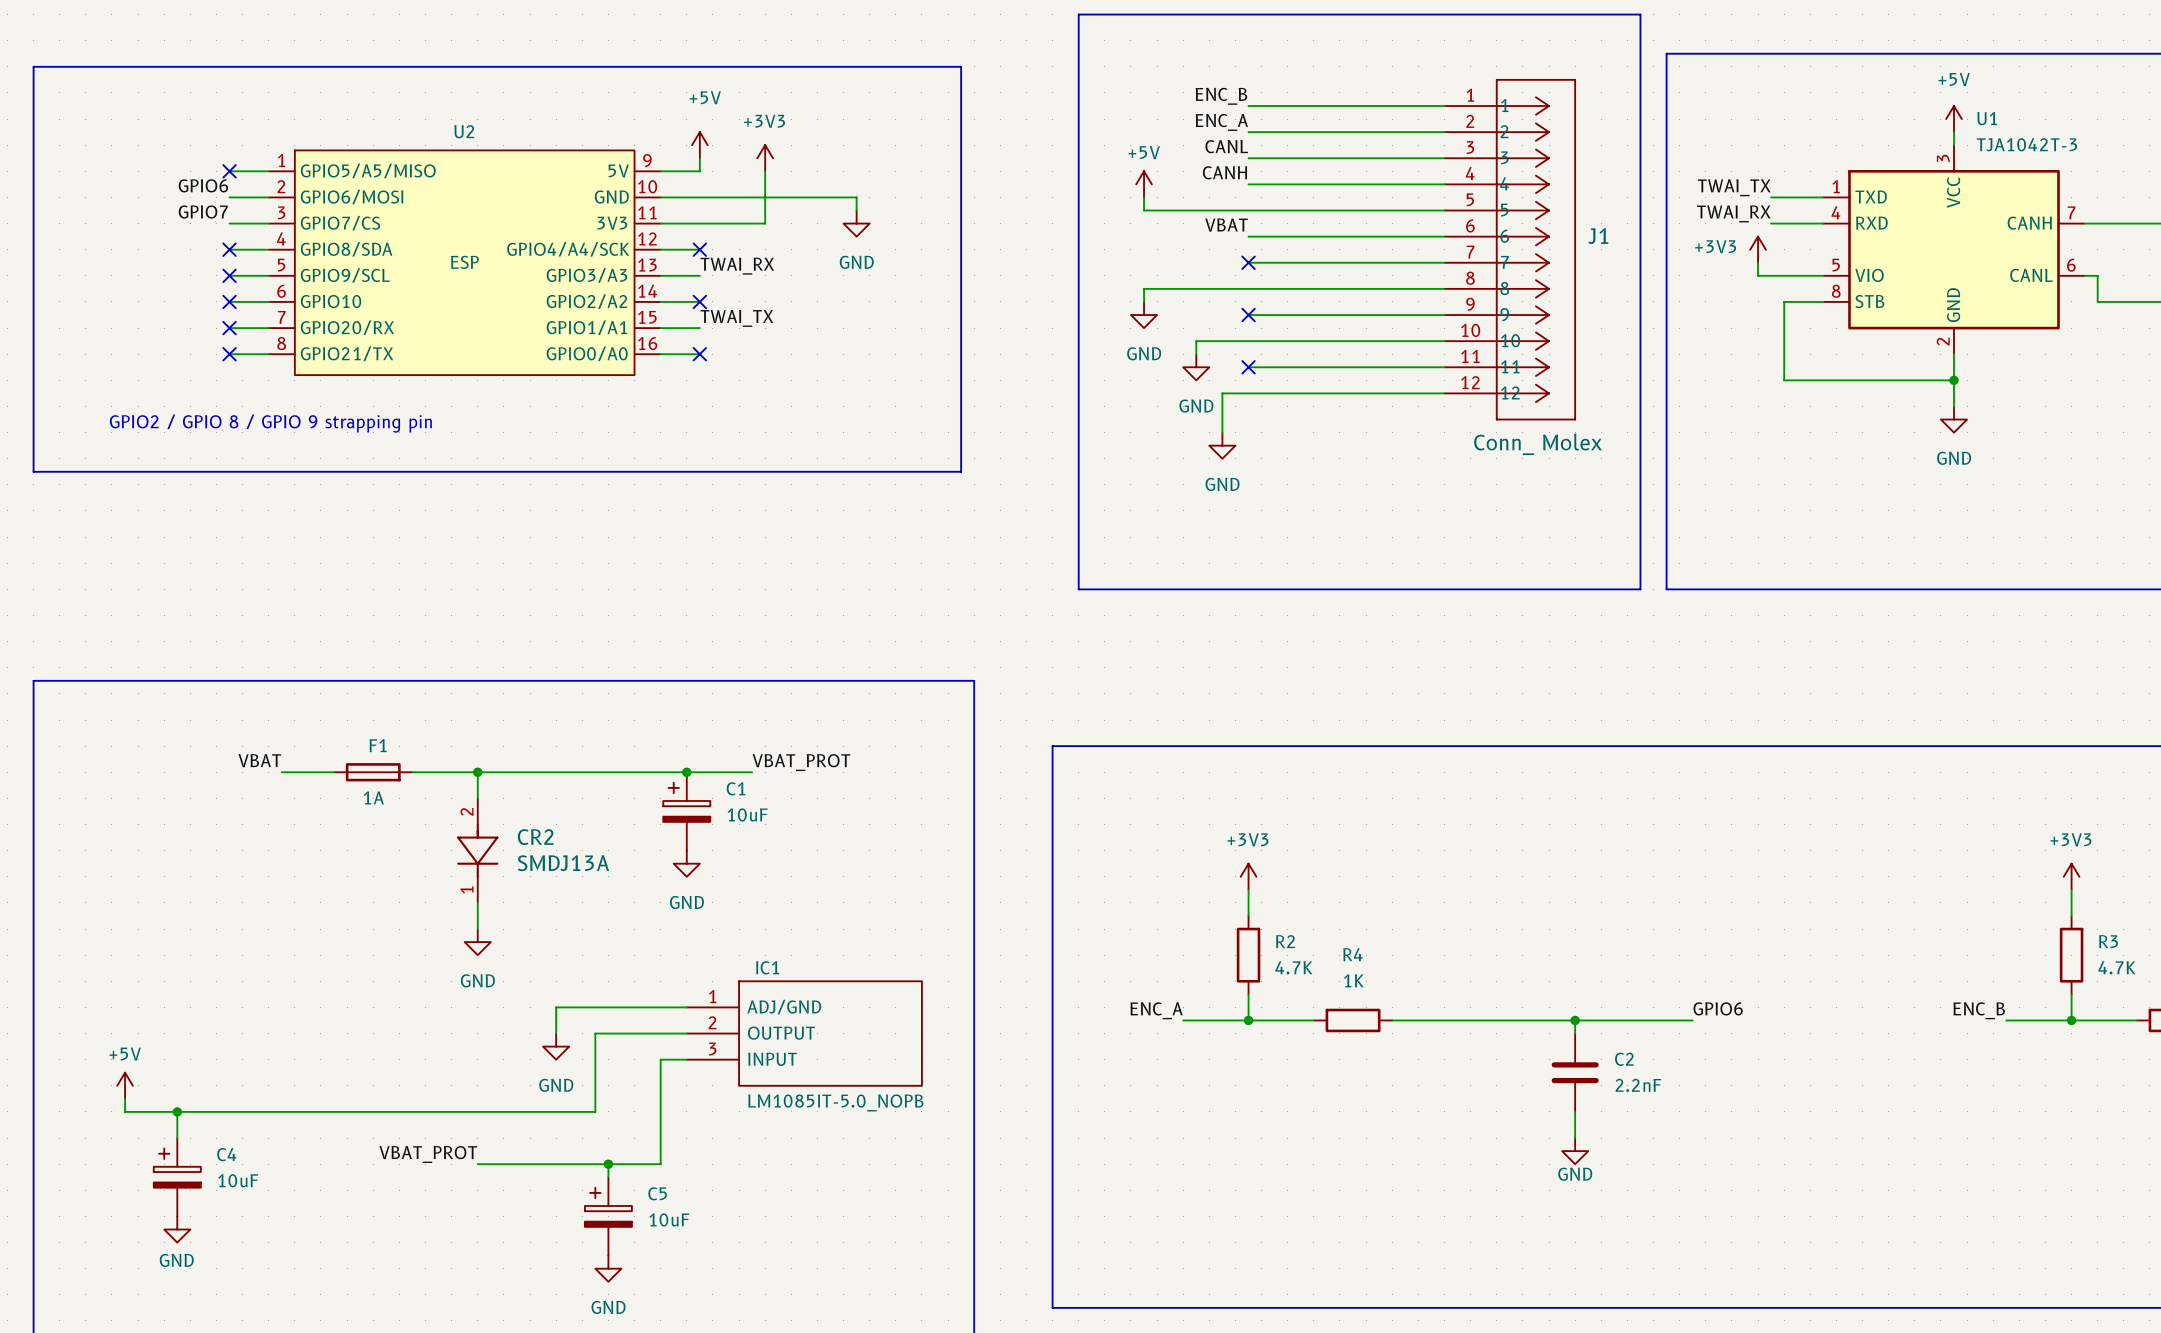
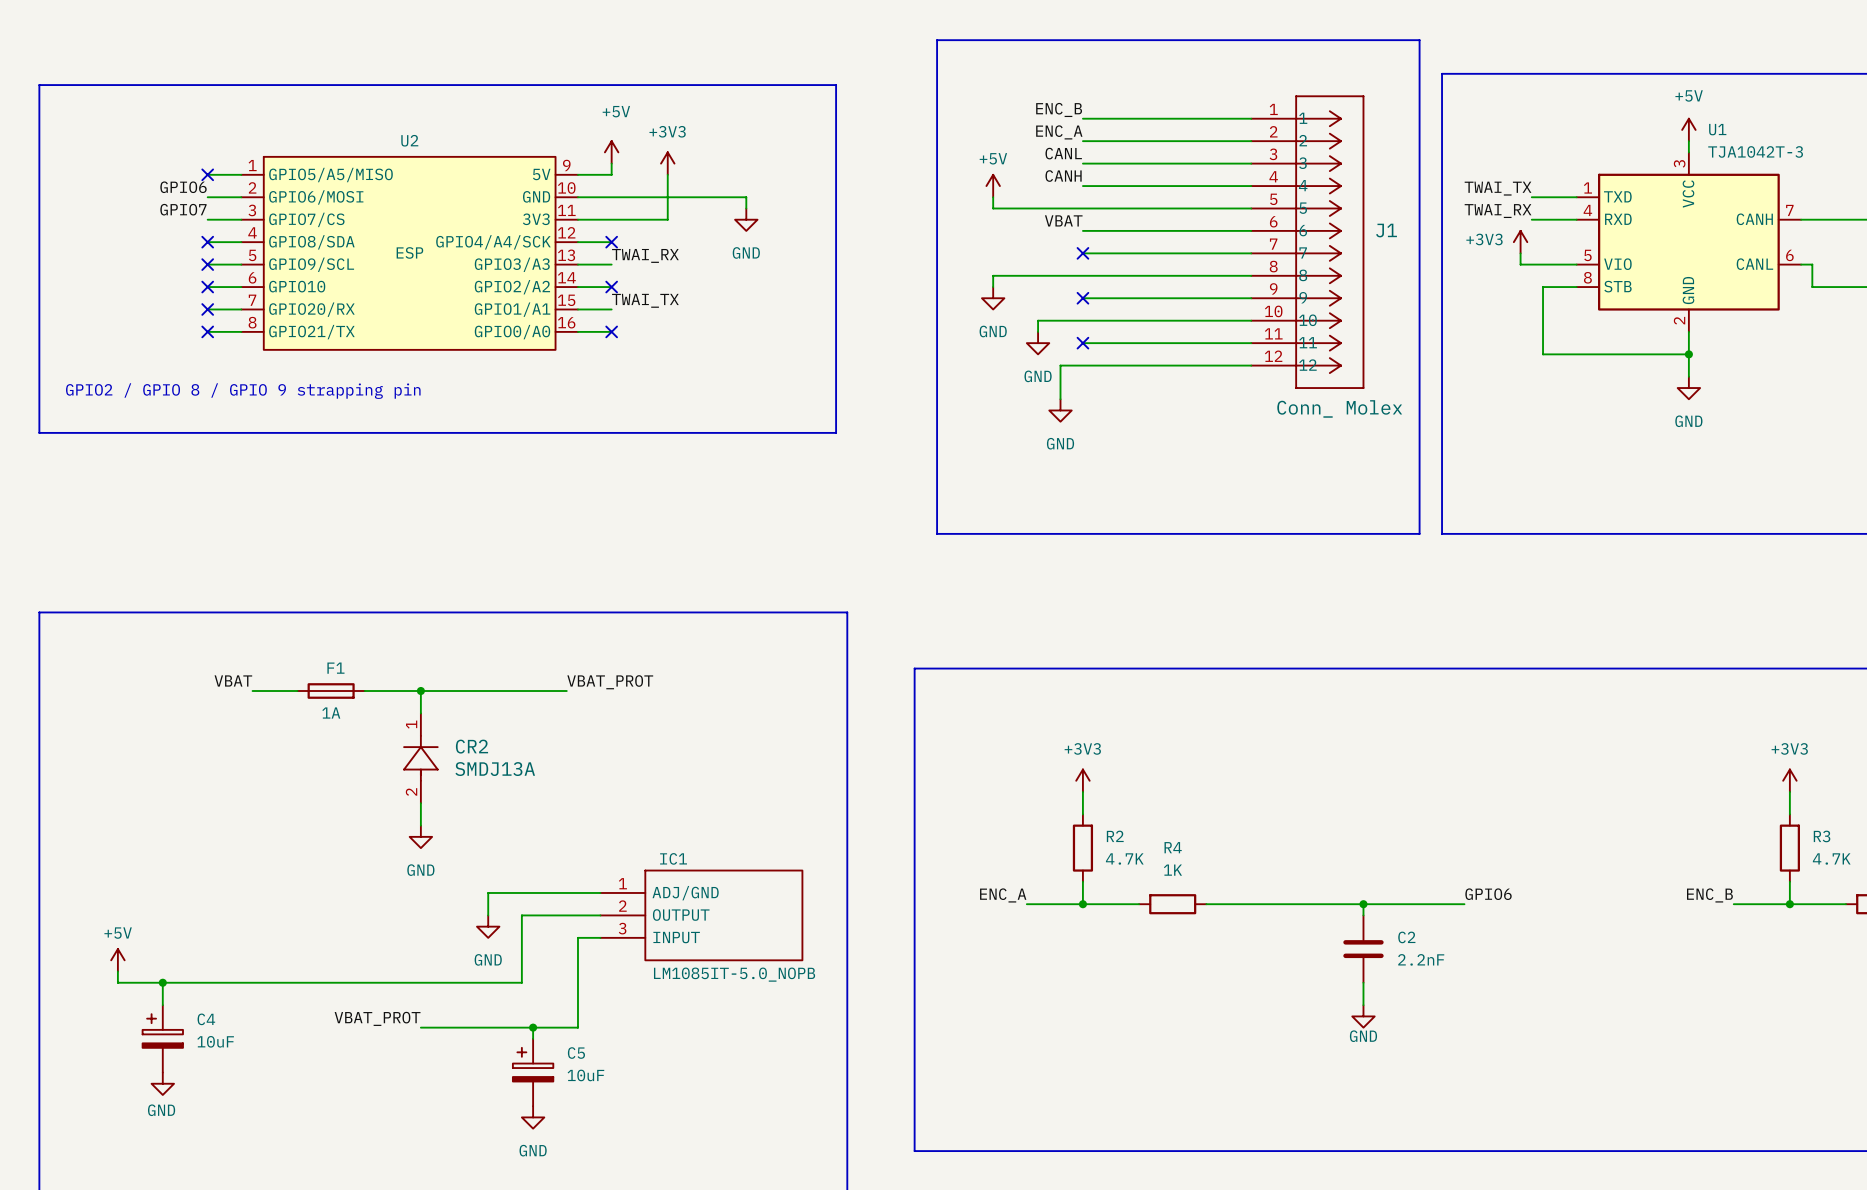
label position: VBAT_PROT (801, 762) -> VBAT_PROT (610, 682)
wire: (647, 772) (752, 772) -> none
junction: (686, 772) -> none
C1: 10uF (686, 811) -> none
CR2 rotation: 0° (477, 850) -> 180° (420, 758)
power symbol: GND (686, 863) -> none

